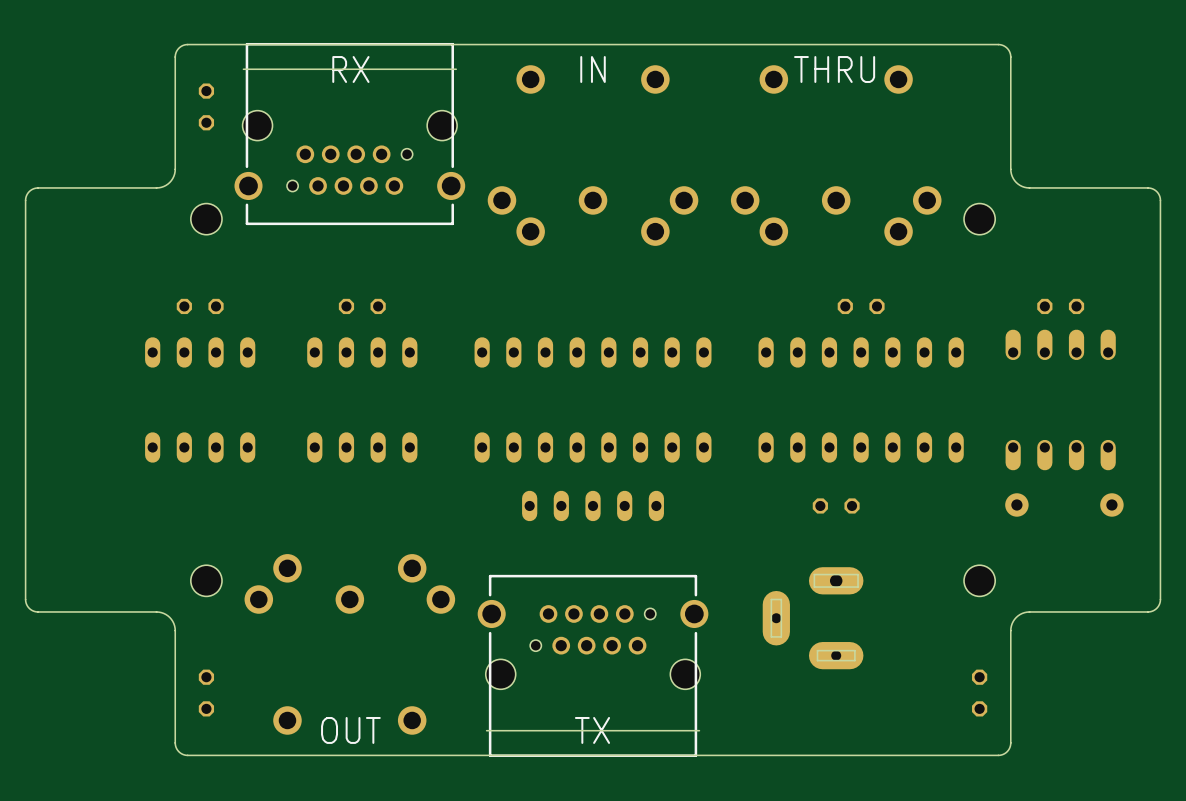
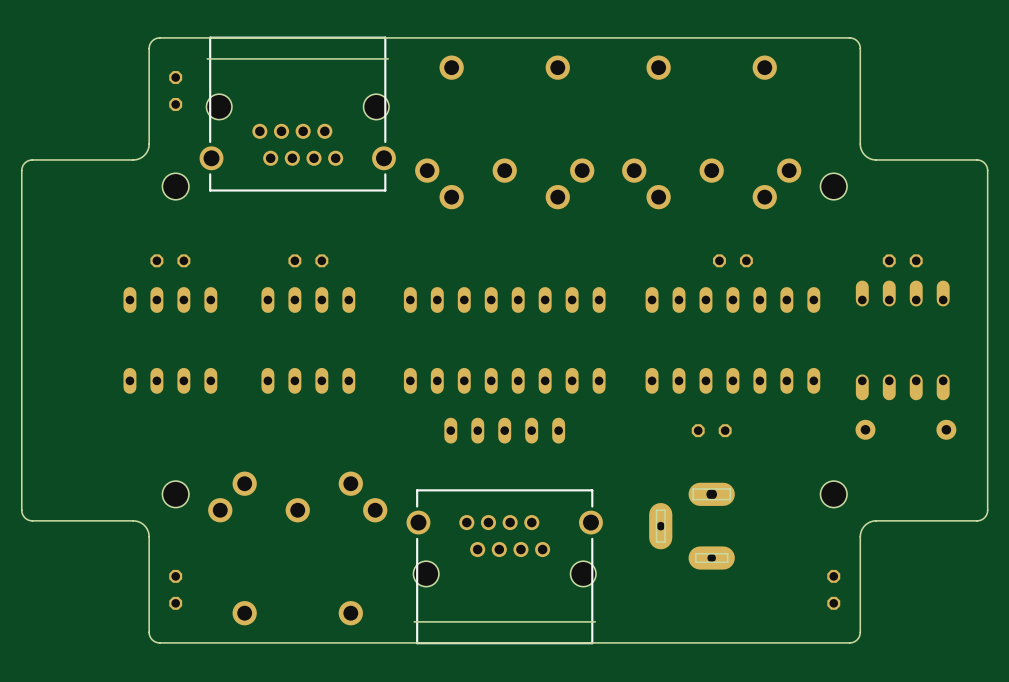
part footprint: [234, 42, 466, 226] -> [199, 36, 396, 192]
text: RX (350, 69) -> none
text: IN (593, 69) -> none
text: THRU (834, 69) -> none
part footprint: [477, 574, 709, 757] -> [406, 489, 603, 645]
text: OUT (350, 730) -> none
text: TX (592, 730) -> none

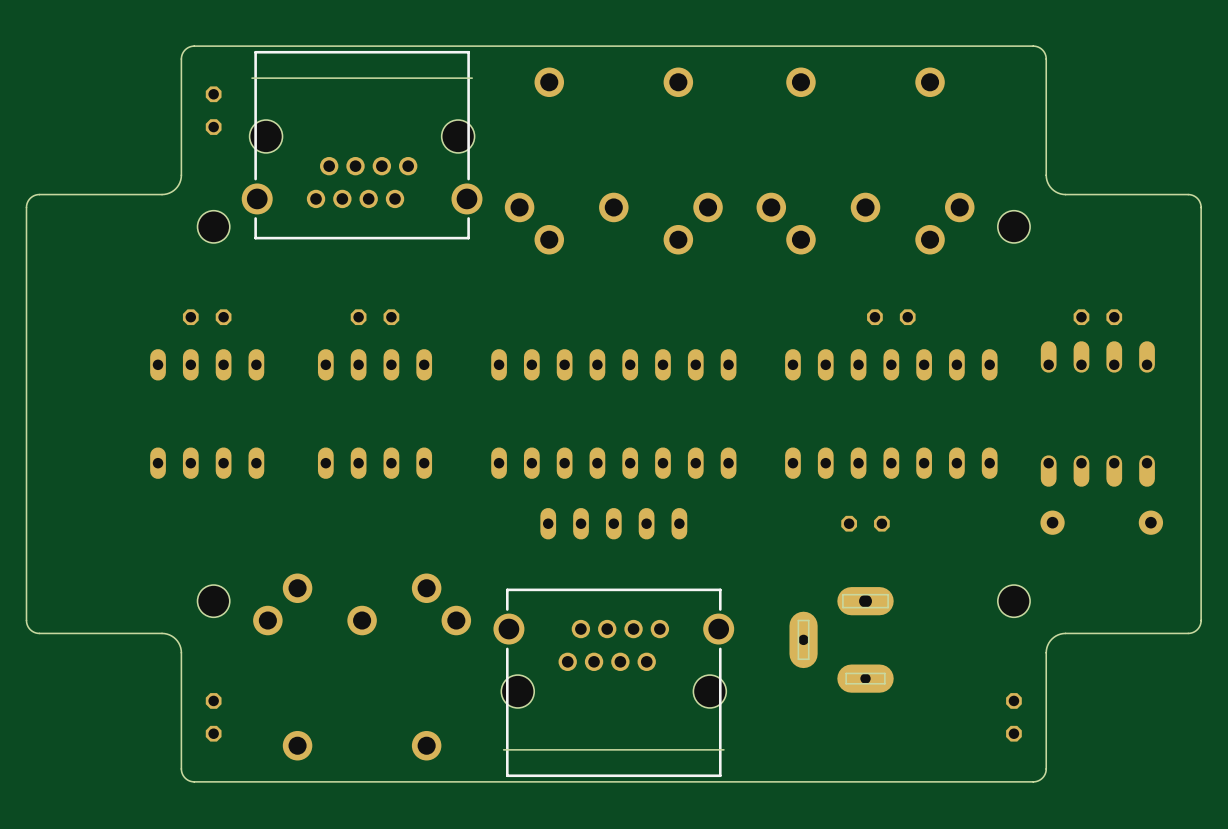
part footprint: [199, 36, 396, 192] -> [241, 50, 483, 240]
part footprint: [406, 489, 603, 645] -> [493, 588, 735, 778]

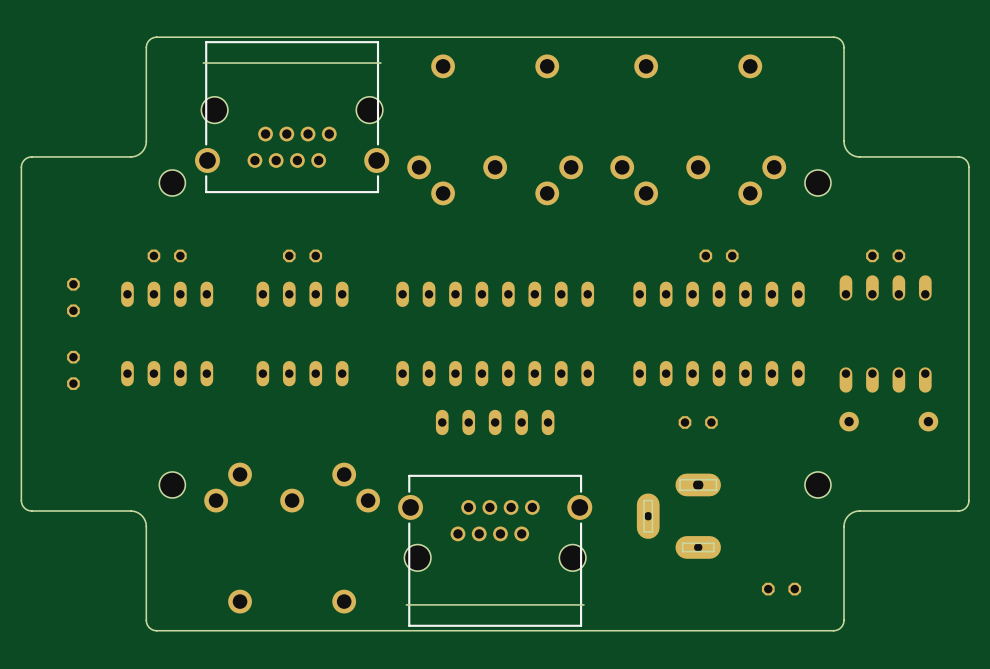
part: (213, 110) -> none
part: none -> (73, 297)
part: none -> (73, 370)
part: (213, 717) -> none
part rotation: 0° (1013, 717) -> 90° clockwise (781, 589)
part position: (1013, 717) -> (781, 589)

